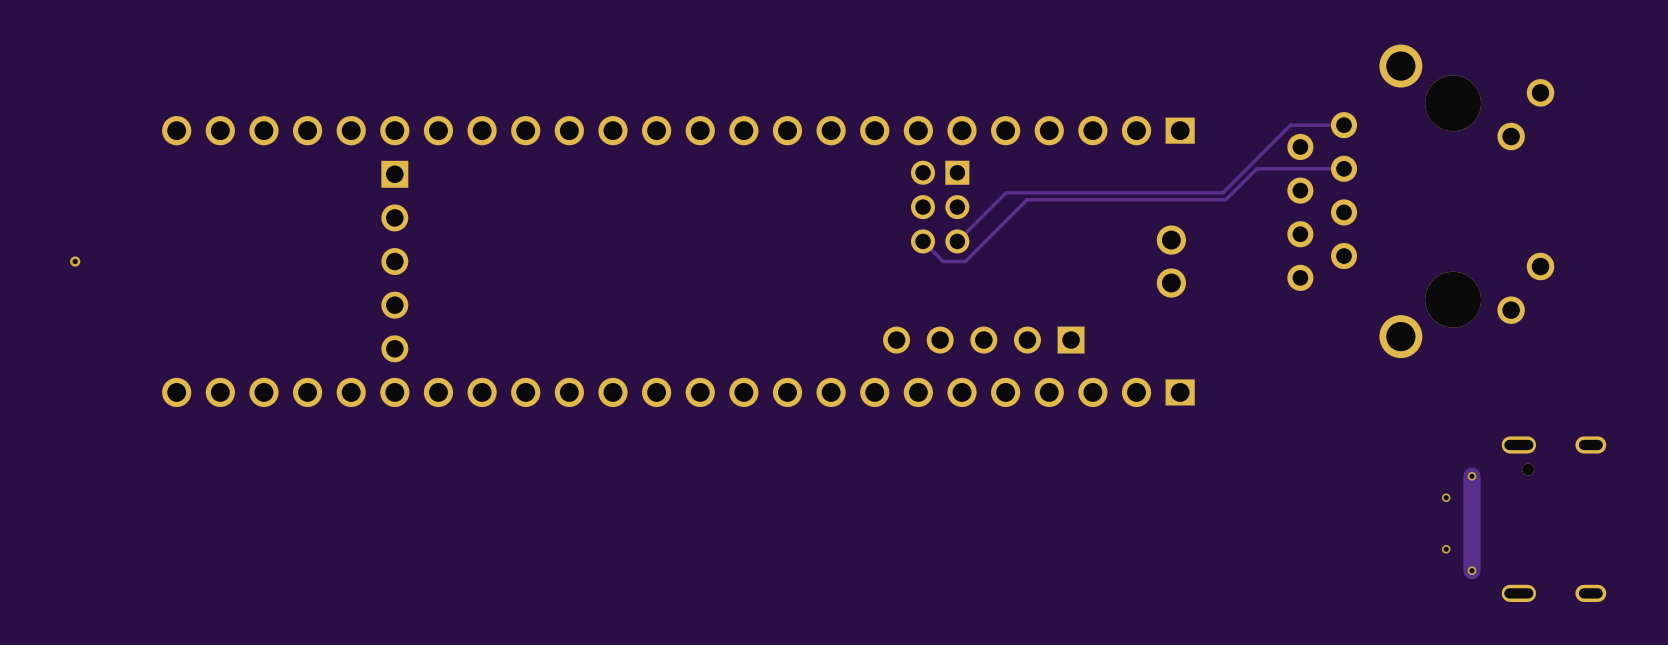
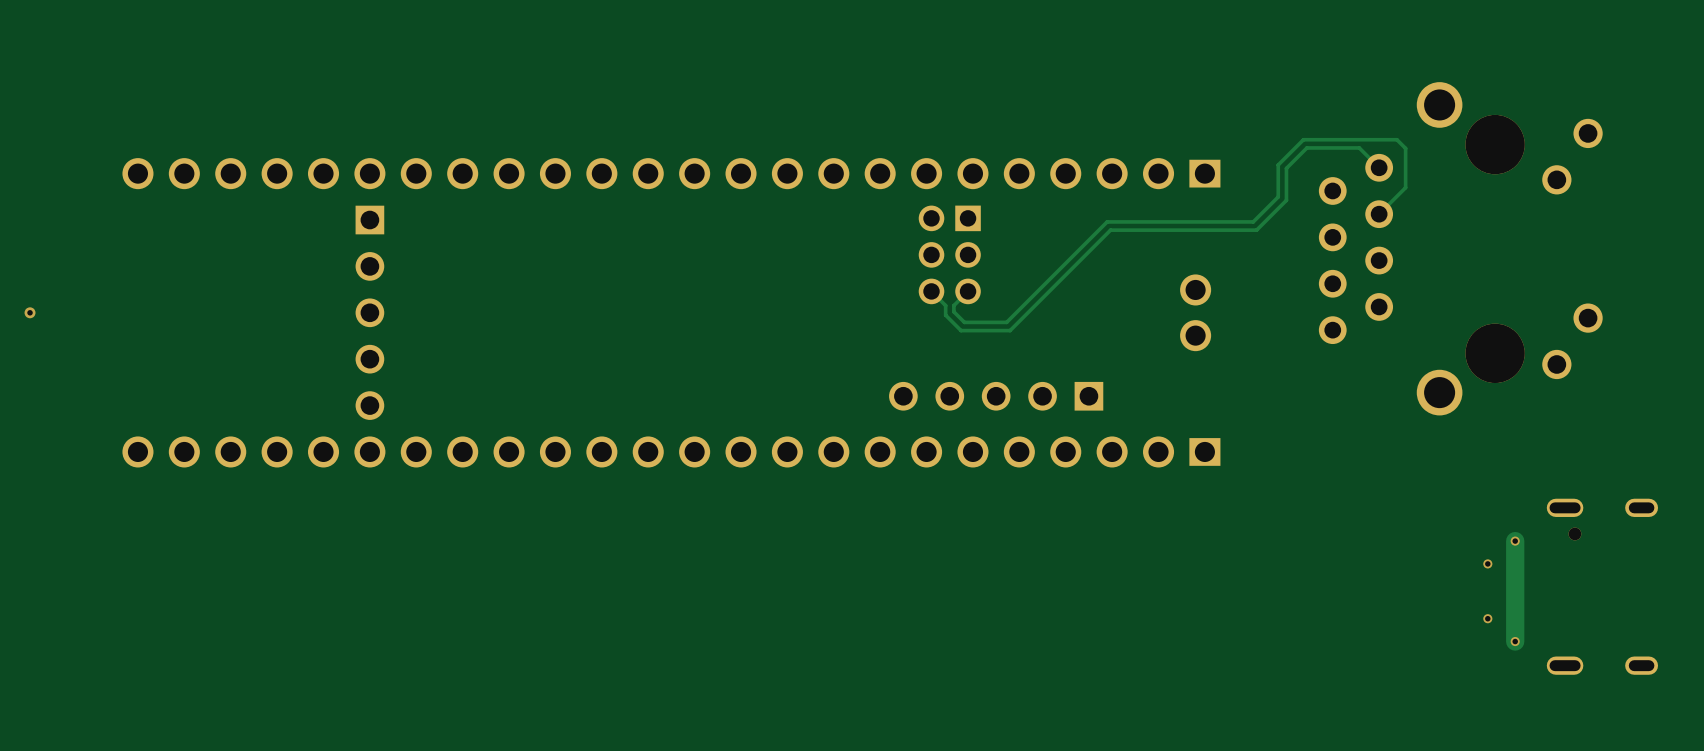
track: (1344, 125) (1290, 125) (1222, 192) (1005, 192) (957, 241) -> (1379, 167) (1359, 147) (1306, 147) (1286, 168) (1286, 200) (1256, 230) (1110, 230) (1010, 330) (961, 330) (945, 315) (945, 305)
track: (1344, 168) (1256, 168) (1225, 199) (1027, 199) (965, 261) (943, 261) (936, 254) -> (1379, 214) (1405, 187) (1405, 148) (1396, 139) (1303, 139) (1278, 164) (1278, 196) (1253, 221) (1107, 221) (1006, 322) (964, 322) (953, 311) (953, 305) (968, 291)

